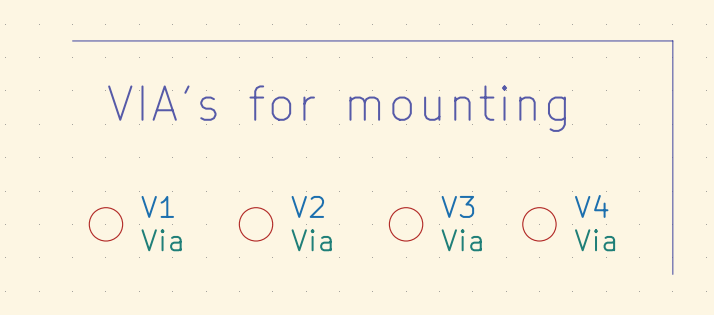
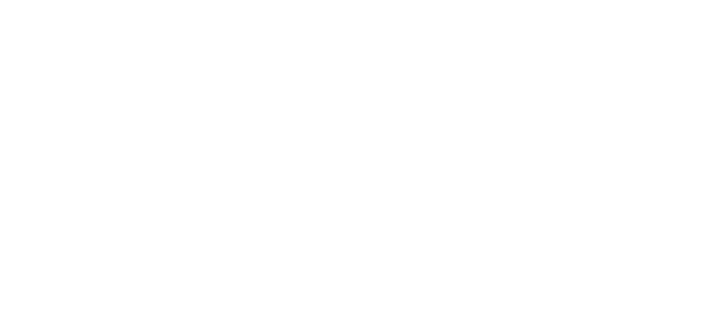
line: (72, 40) (672, 40) (672, 274) -> none
text: VIA's for mounting (337, 108) -> none
V1: Via (105, 224) -> none
V2: Via (256, 224) -> none
V3: Via (406, 224) -> none
V4: Via (539, 224) -> none

